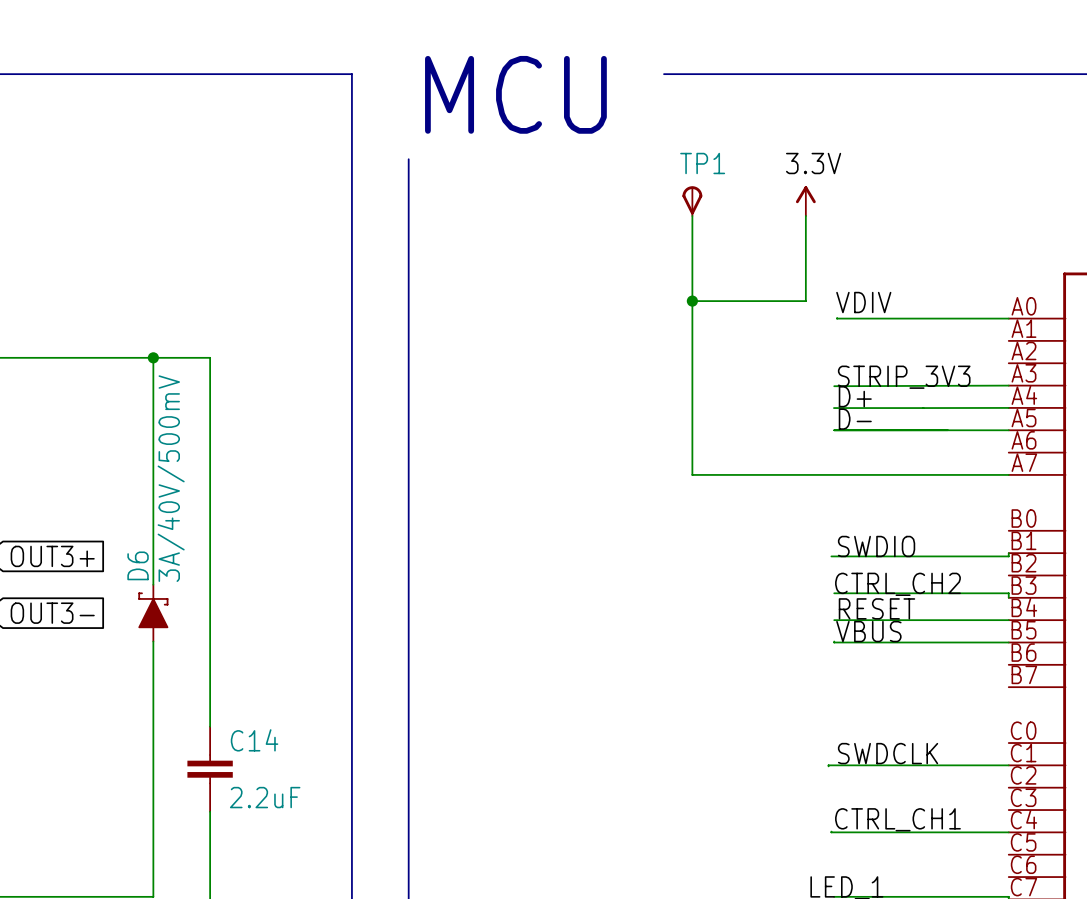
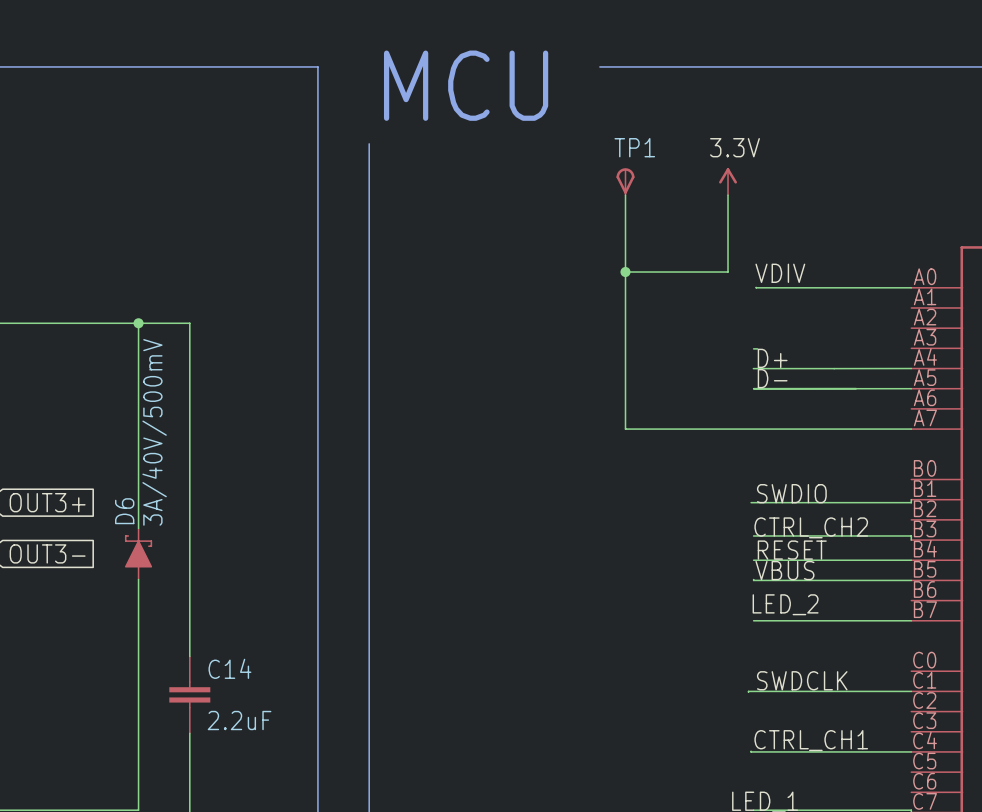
label: STRIP_3V3 (904, 377) -> none
wire: (1008, 385) (838, 386) -> none
label: none -> LED_2 (785, 604)
wire: none -> (753, 620) (911, 620)

